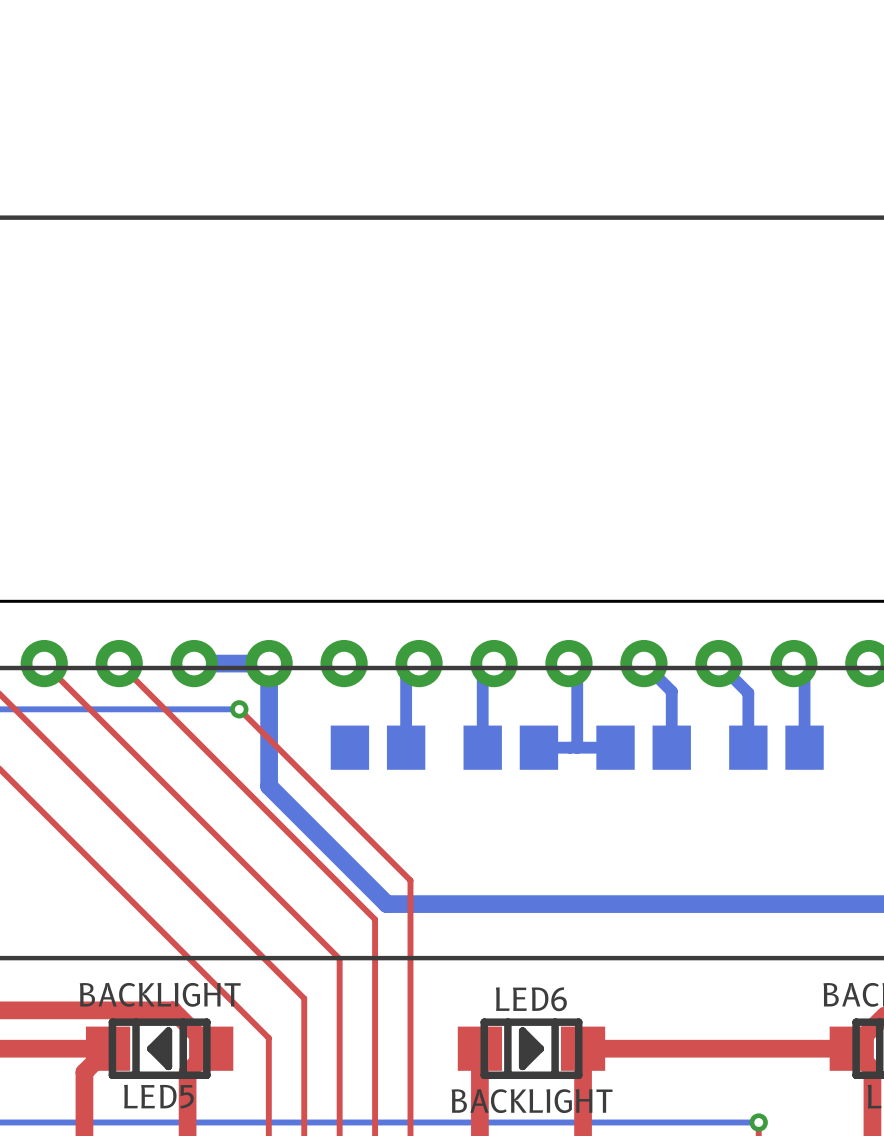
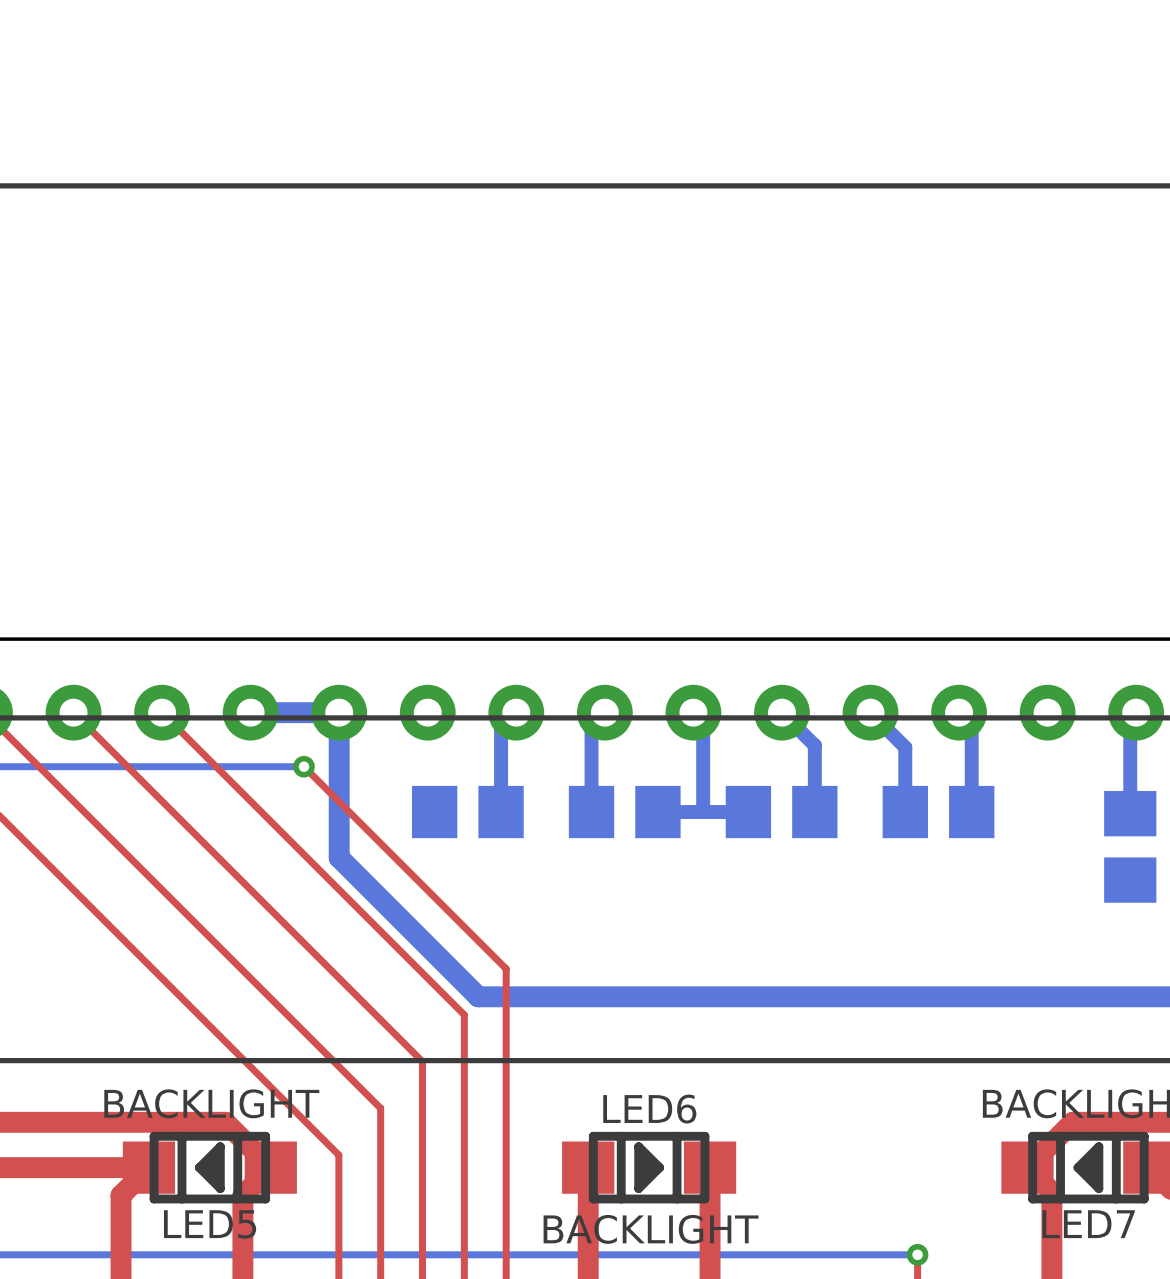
top track: (583, 1048) (851, 1048) -> none

